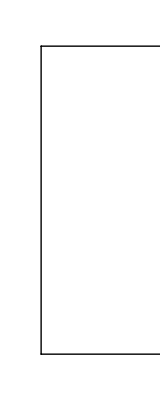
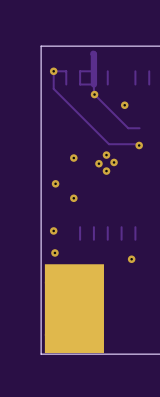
track: none -> (93, 53) (93, 84)
via: none -> (53, 71)
track: none -> (93, 71) (80, 71) (80, 84) (93, 84)
track: none -> (107, 71) (107, 84)
track: none -> (135, 71) (135, 84)
track: none -> (149, 71) (149, 84)
track: none -> (66, 84) (66, 71) (53, 71) (53, 88) (109, 144) (139, 145)
track: none -> (93, 84) (93, 93) (128, 128) (139, 128)
via: none -> (94, 94)
via: none -> (124, 105)
via: none -> (139, 145)
via: none -> (106, 155)
via: none -> (73, 158)
via: none -> (114, 162)
via: none -> (98, 163)
via: none -> (106, 171)
via: none -> (55, 183)
via: none -> (73, 198)
track: none -> (80, 227) (80, 239)
track: none -> (93, 227) (93, 239)
track: none -> (107, 227) (107, 239)
track: none -> (121, 227) (121, 239)
track: none -> (135, 227) (135, 239)
via: none -> (53, 230)
via: none -> (54, 252)
via: none -> (131, 259)
part: none -> (74, 308)

